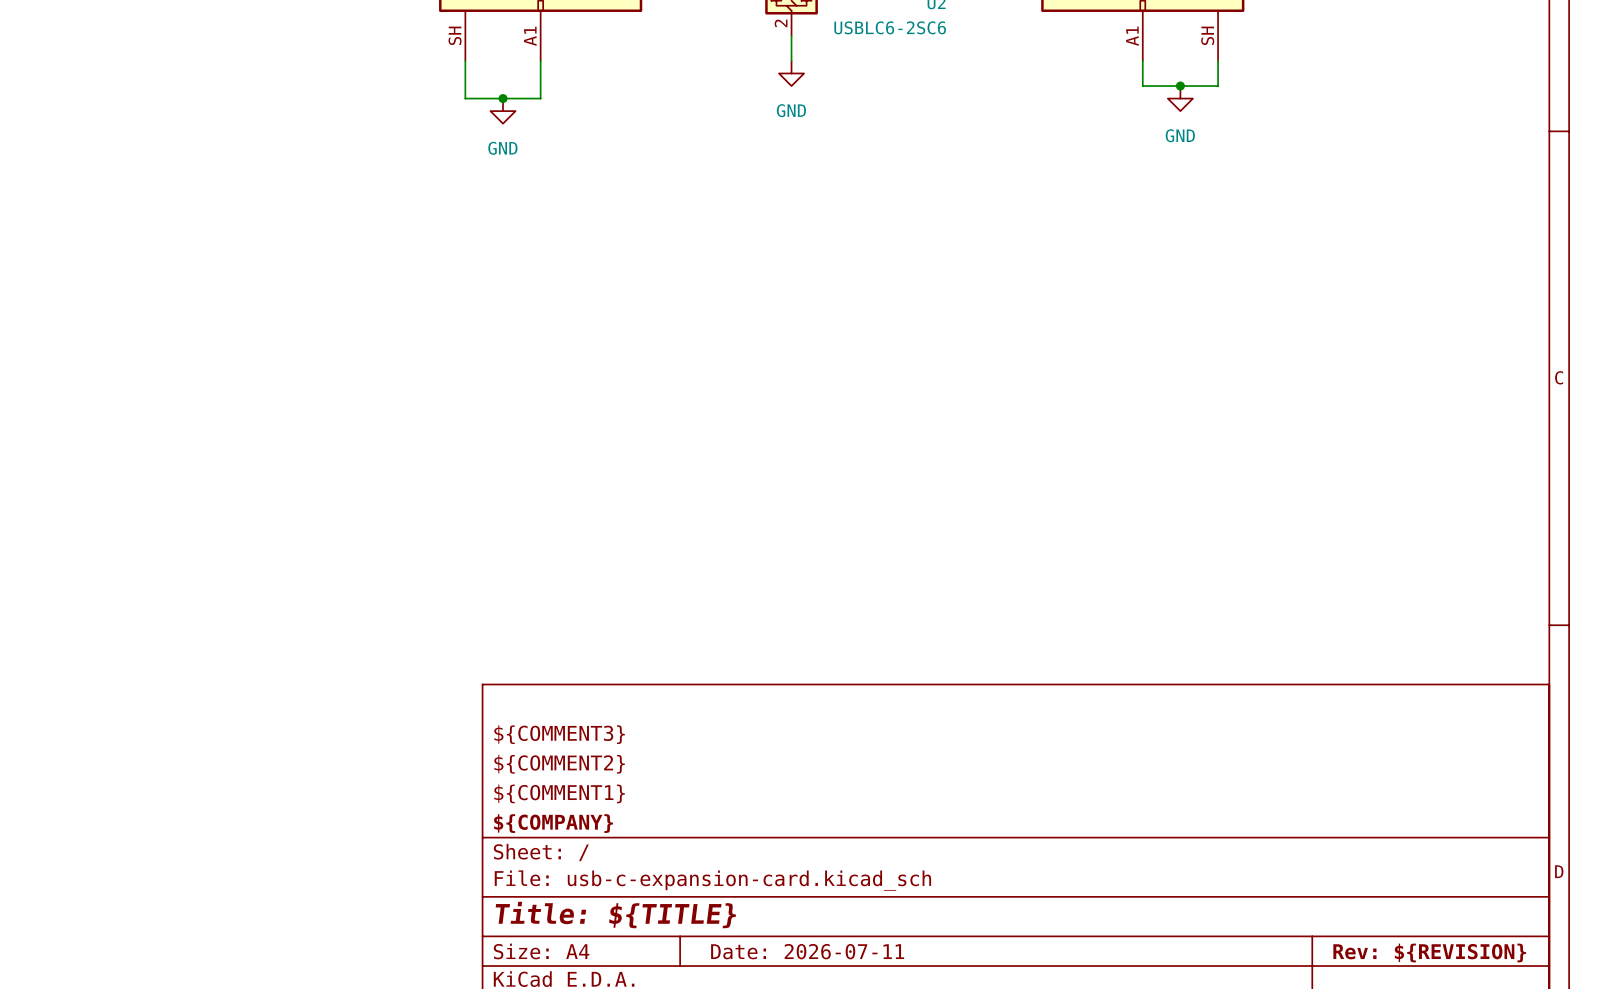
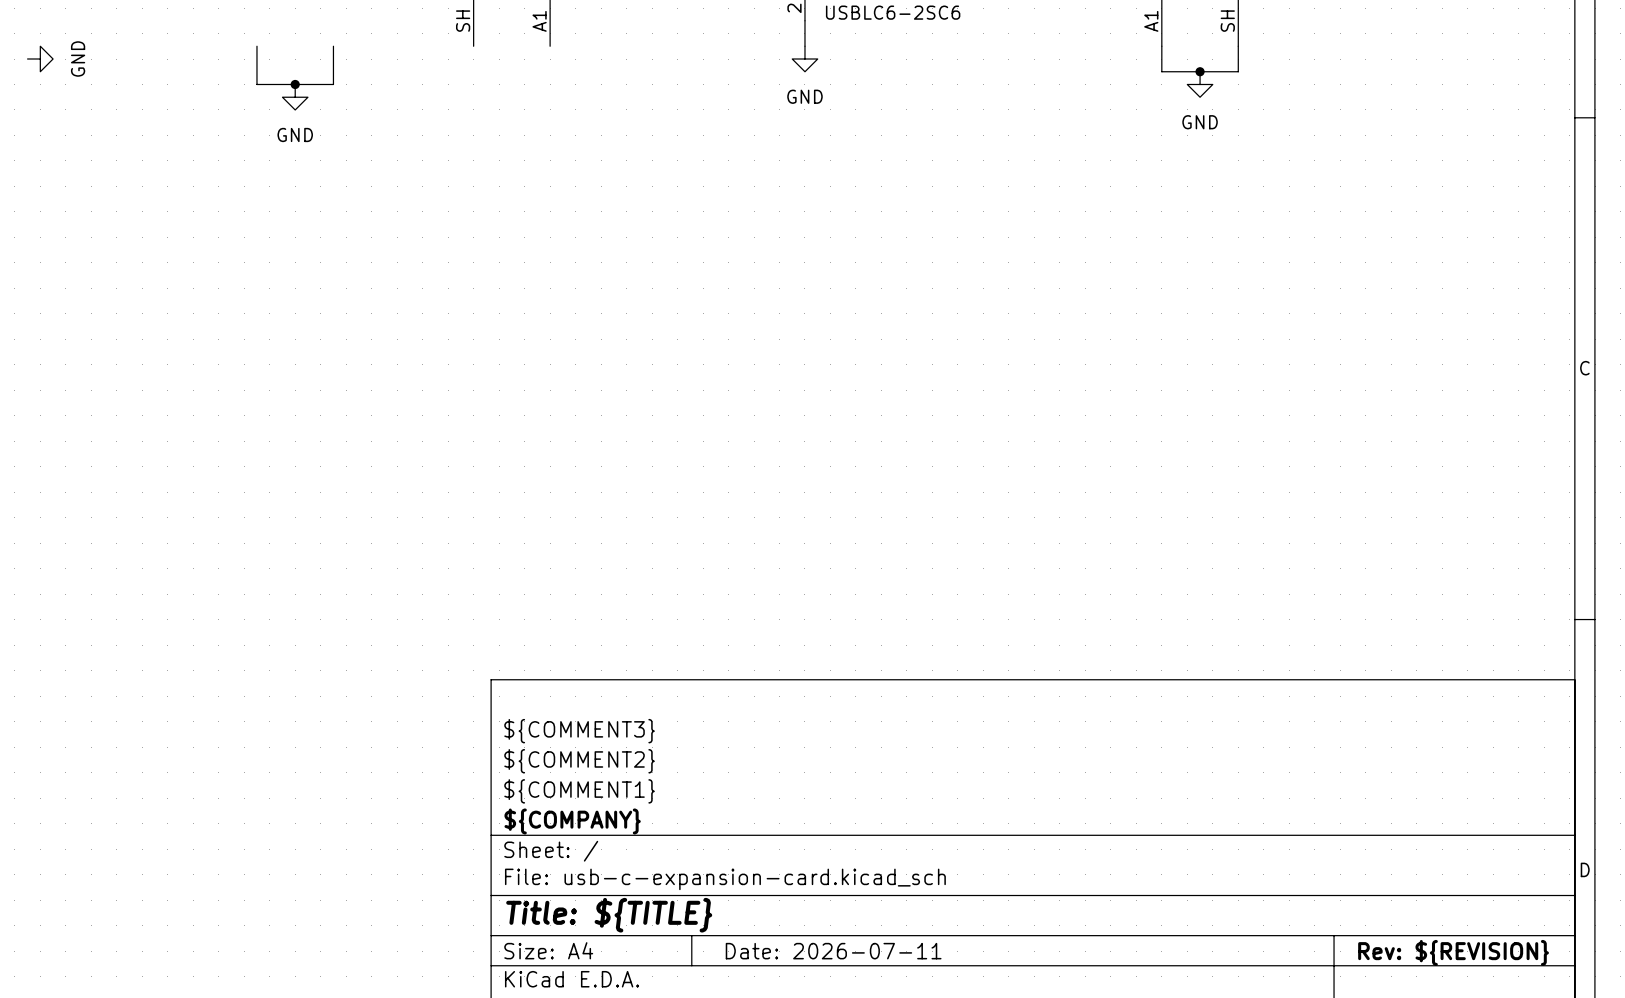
wire: (465, 60) (465, 98) (540, 98) (540, 60) -> (256, 46) (256, 84) (333, 84) (333, 46)
power symbol: none -> GND (40, 59)
junction: none -> (295, 84)
junction: (503, 98) -> none
power symbol position: GND (503, 111) -> GND (295, 97)

